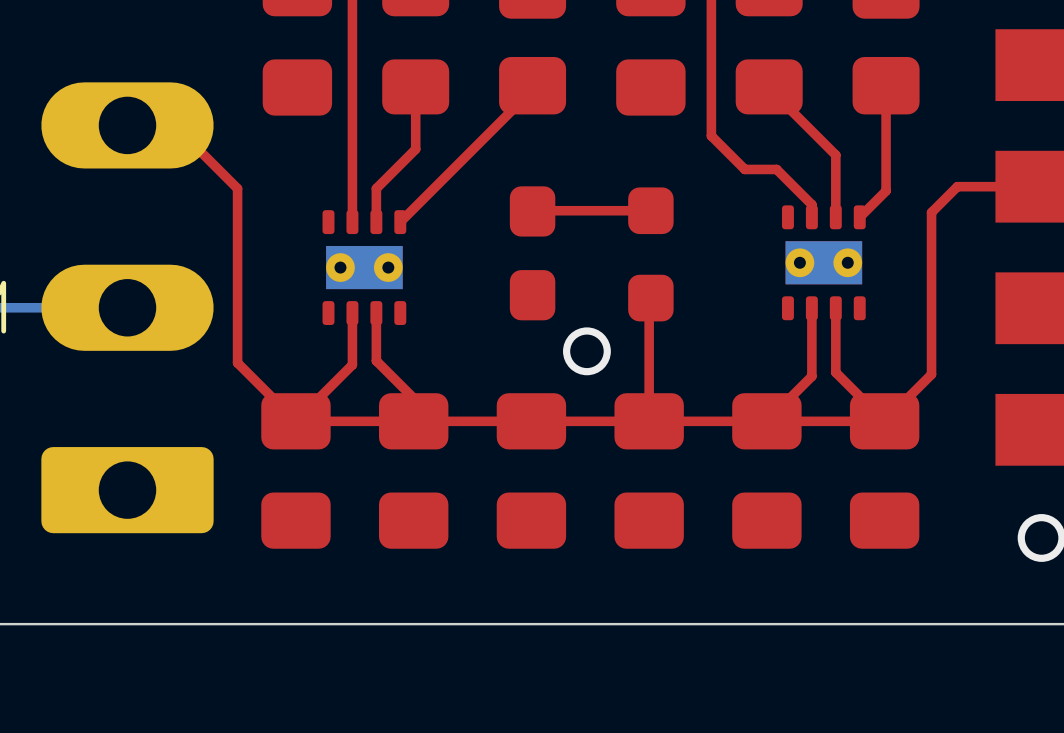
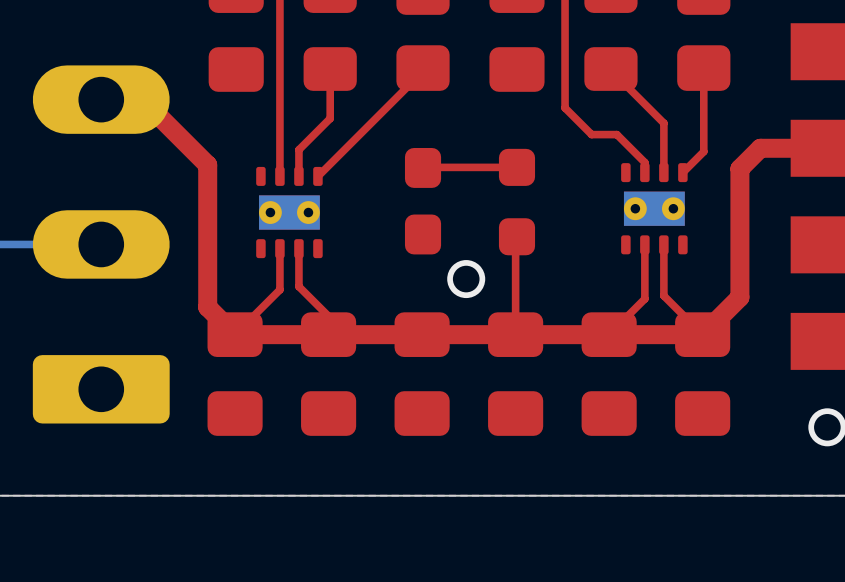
top track: (55, 145) (194, 145) (237, 188) (237, 362) (261, 386) -> (101, 99) (142, 99) (207, 165) (207, 307)
top track width: thin (1044, 186) (957, 186) (931, 212) (931, 374) (884, 421) (295, 421) (261, 386) -> thick (829, 148) (760, 148) (739, 168) (739, 297) (702, 334) (235, 334) (207, 307)

